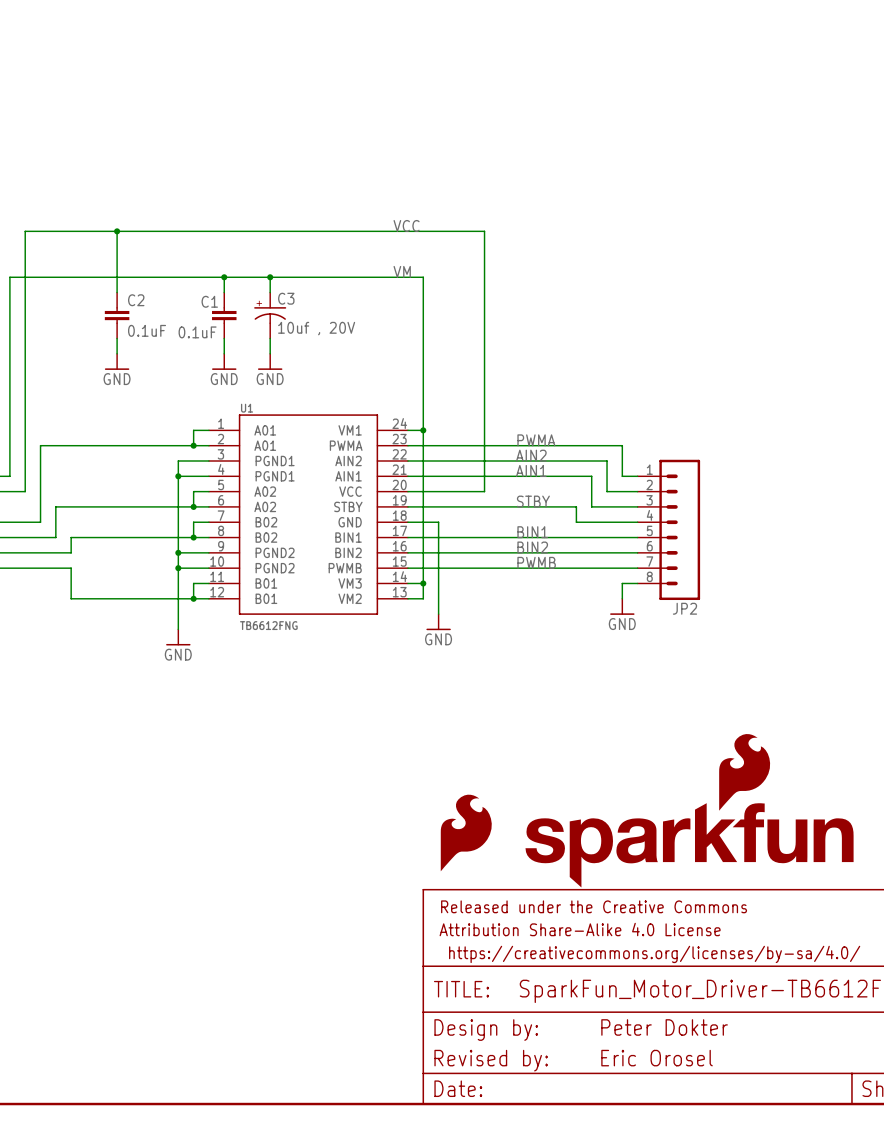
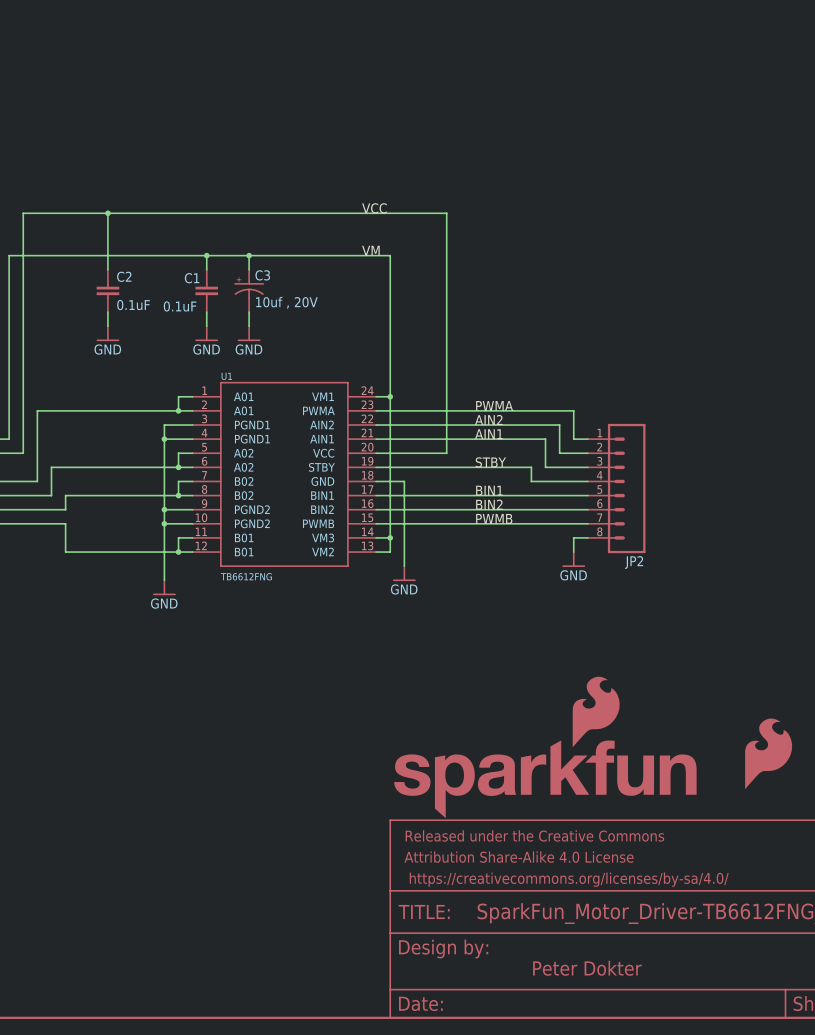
part position: (689, 810) -> (545, 747)
part: none -> (768, 753)
part: (466, 832) -> none
text position: Peter Dokter (664, 1027) -> Peter Dokter (587, 968)
text: Eric Orosel (657, 1058) -> none
text: Revised by: (491, 1060) -> none

